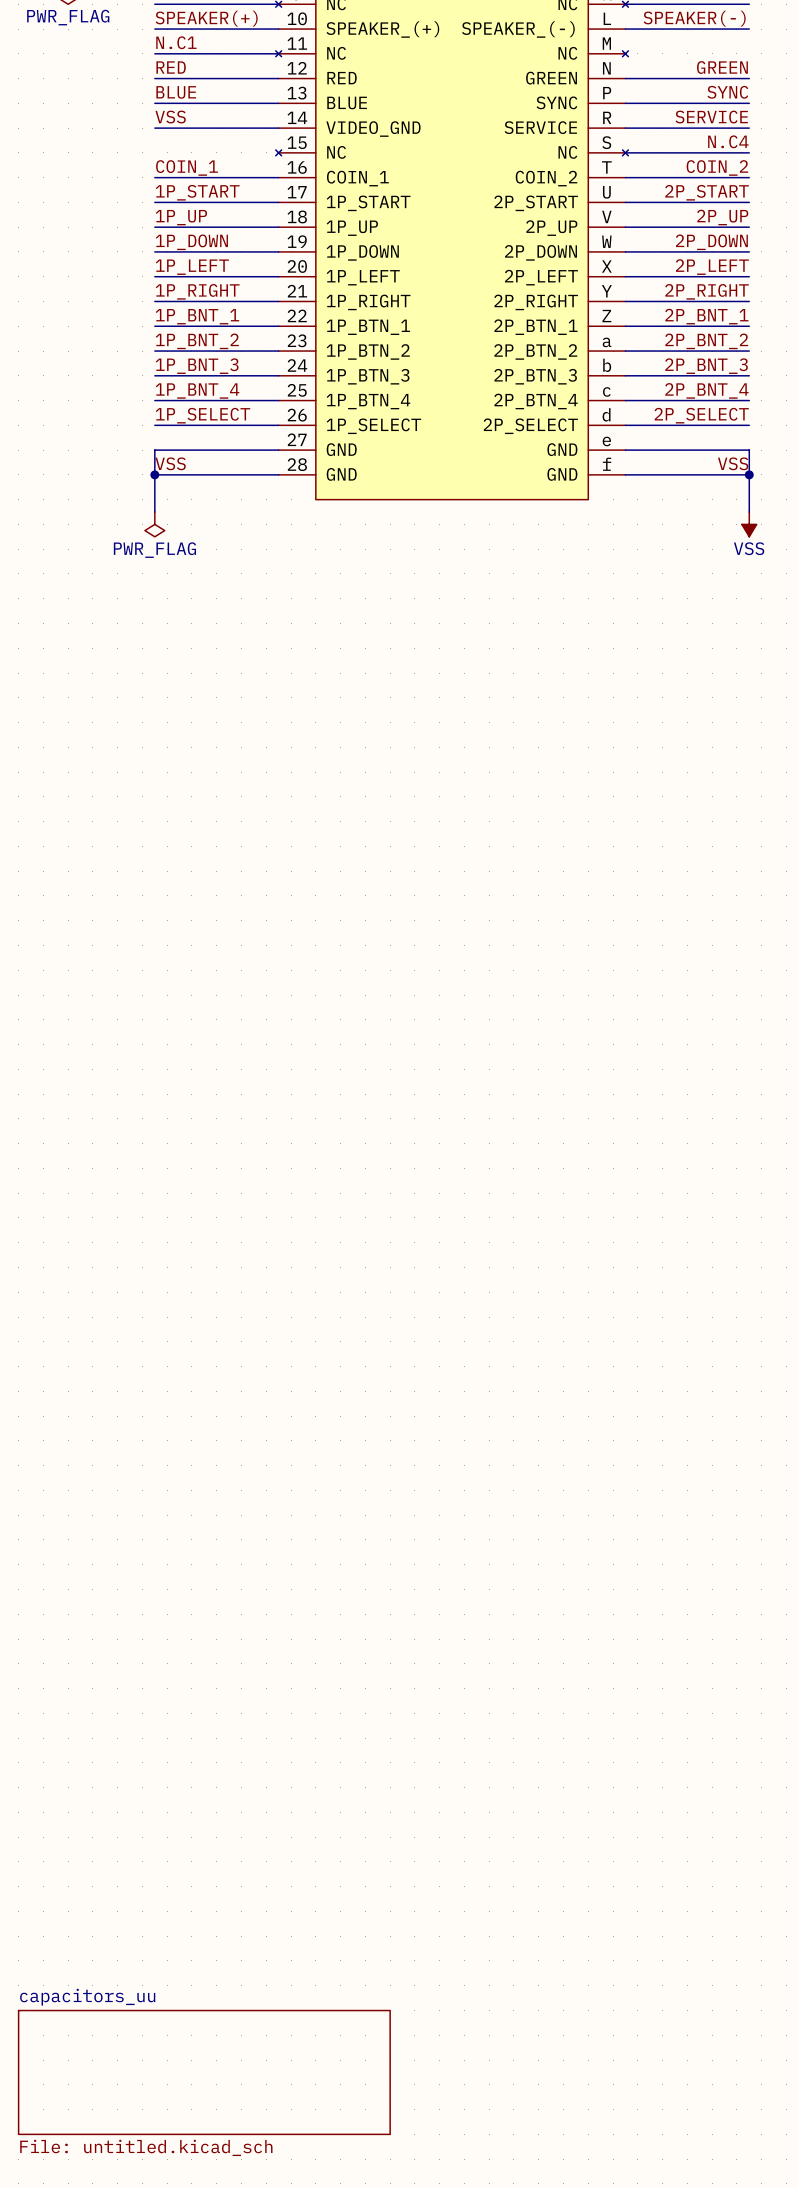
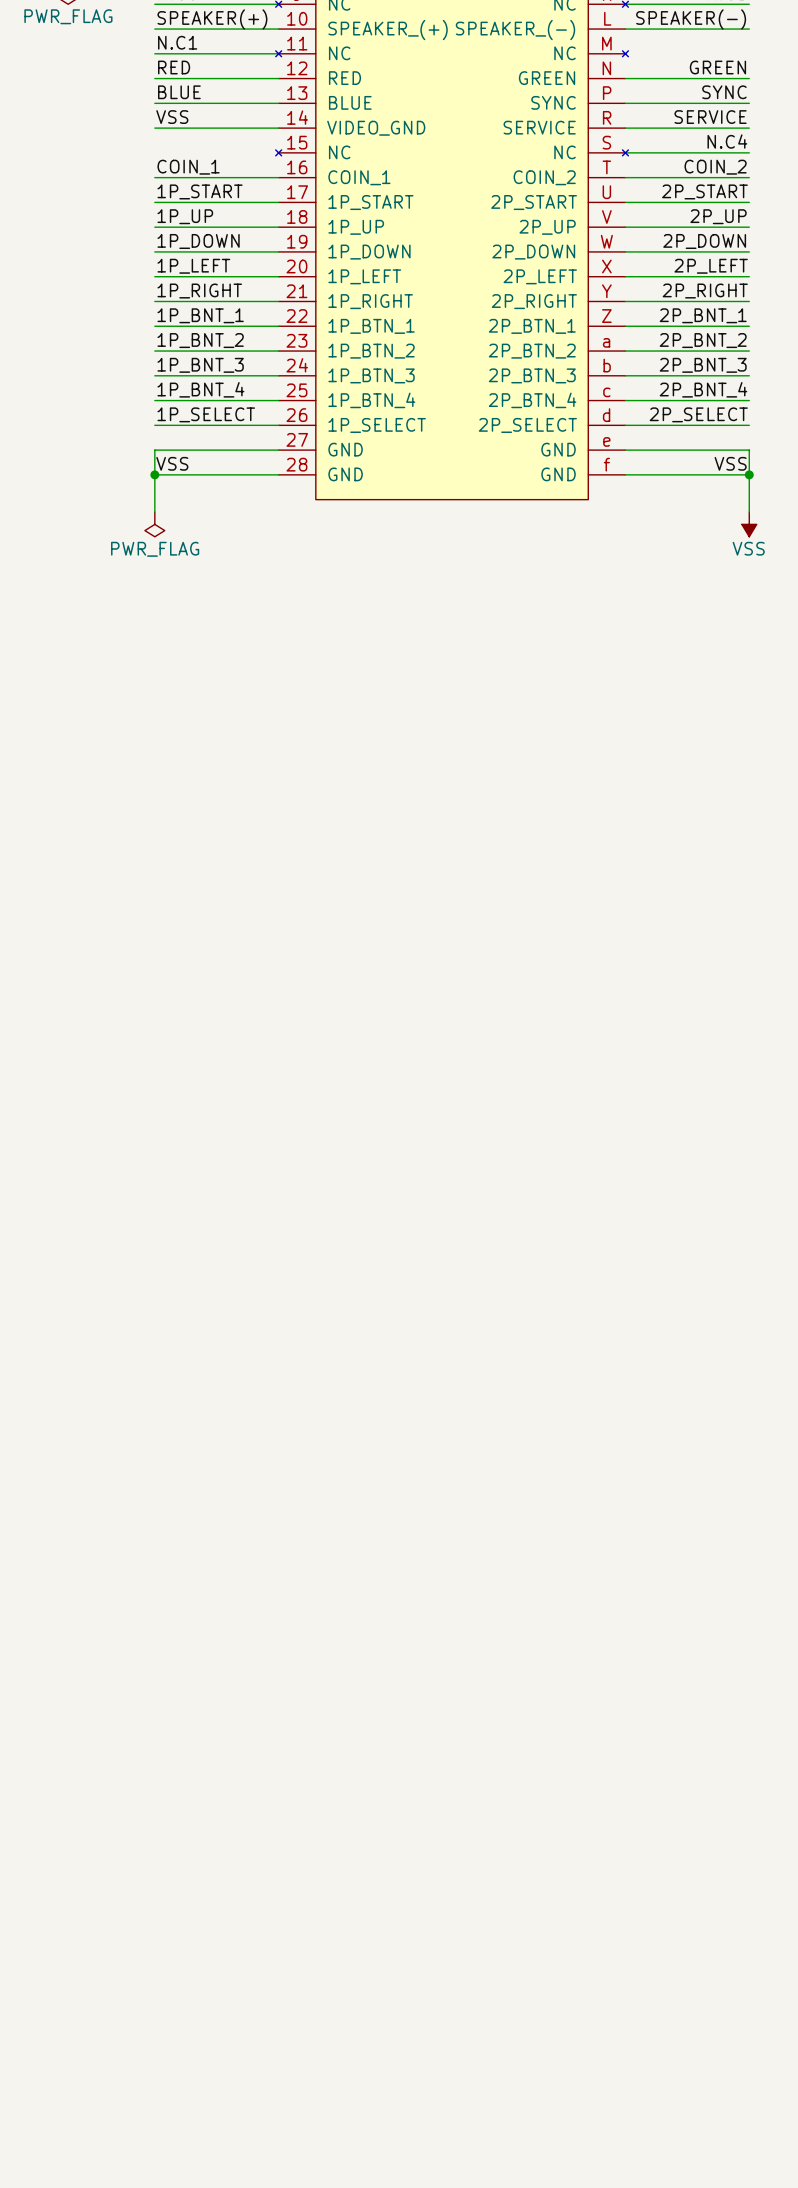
sheet capacitors_uu: File: untitled.kicad_sch (204, 2072) -> none

